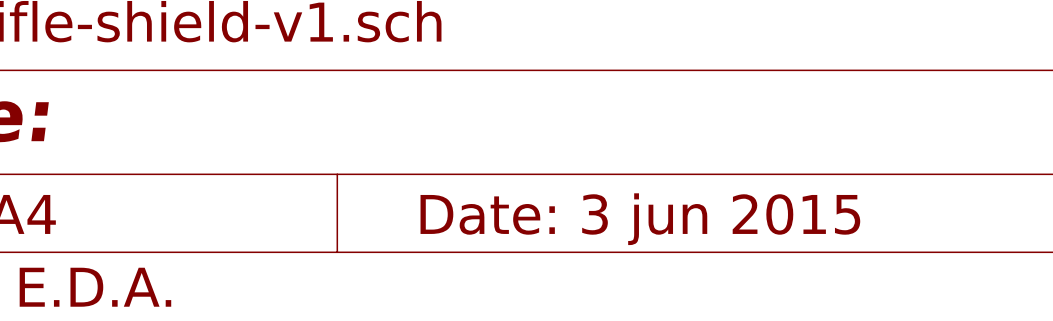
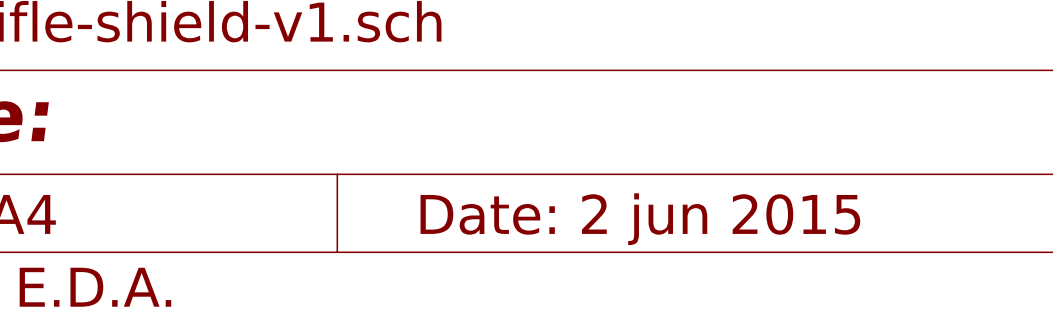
title block: Date: 3 jun 2015 (640, 219) -> Date: 2 jun 2015 (640, 219)

